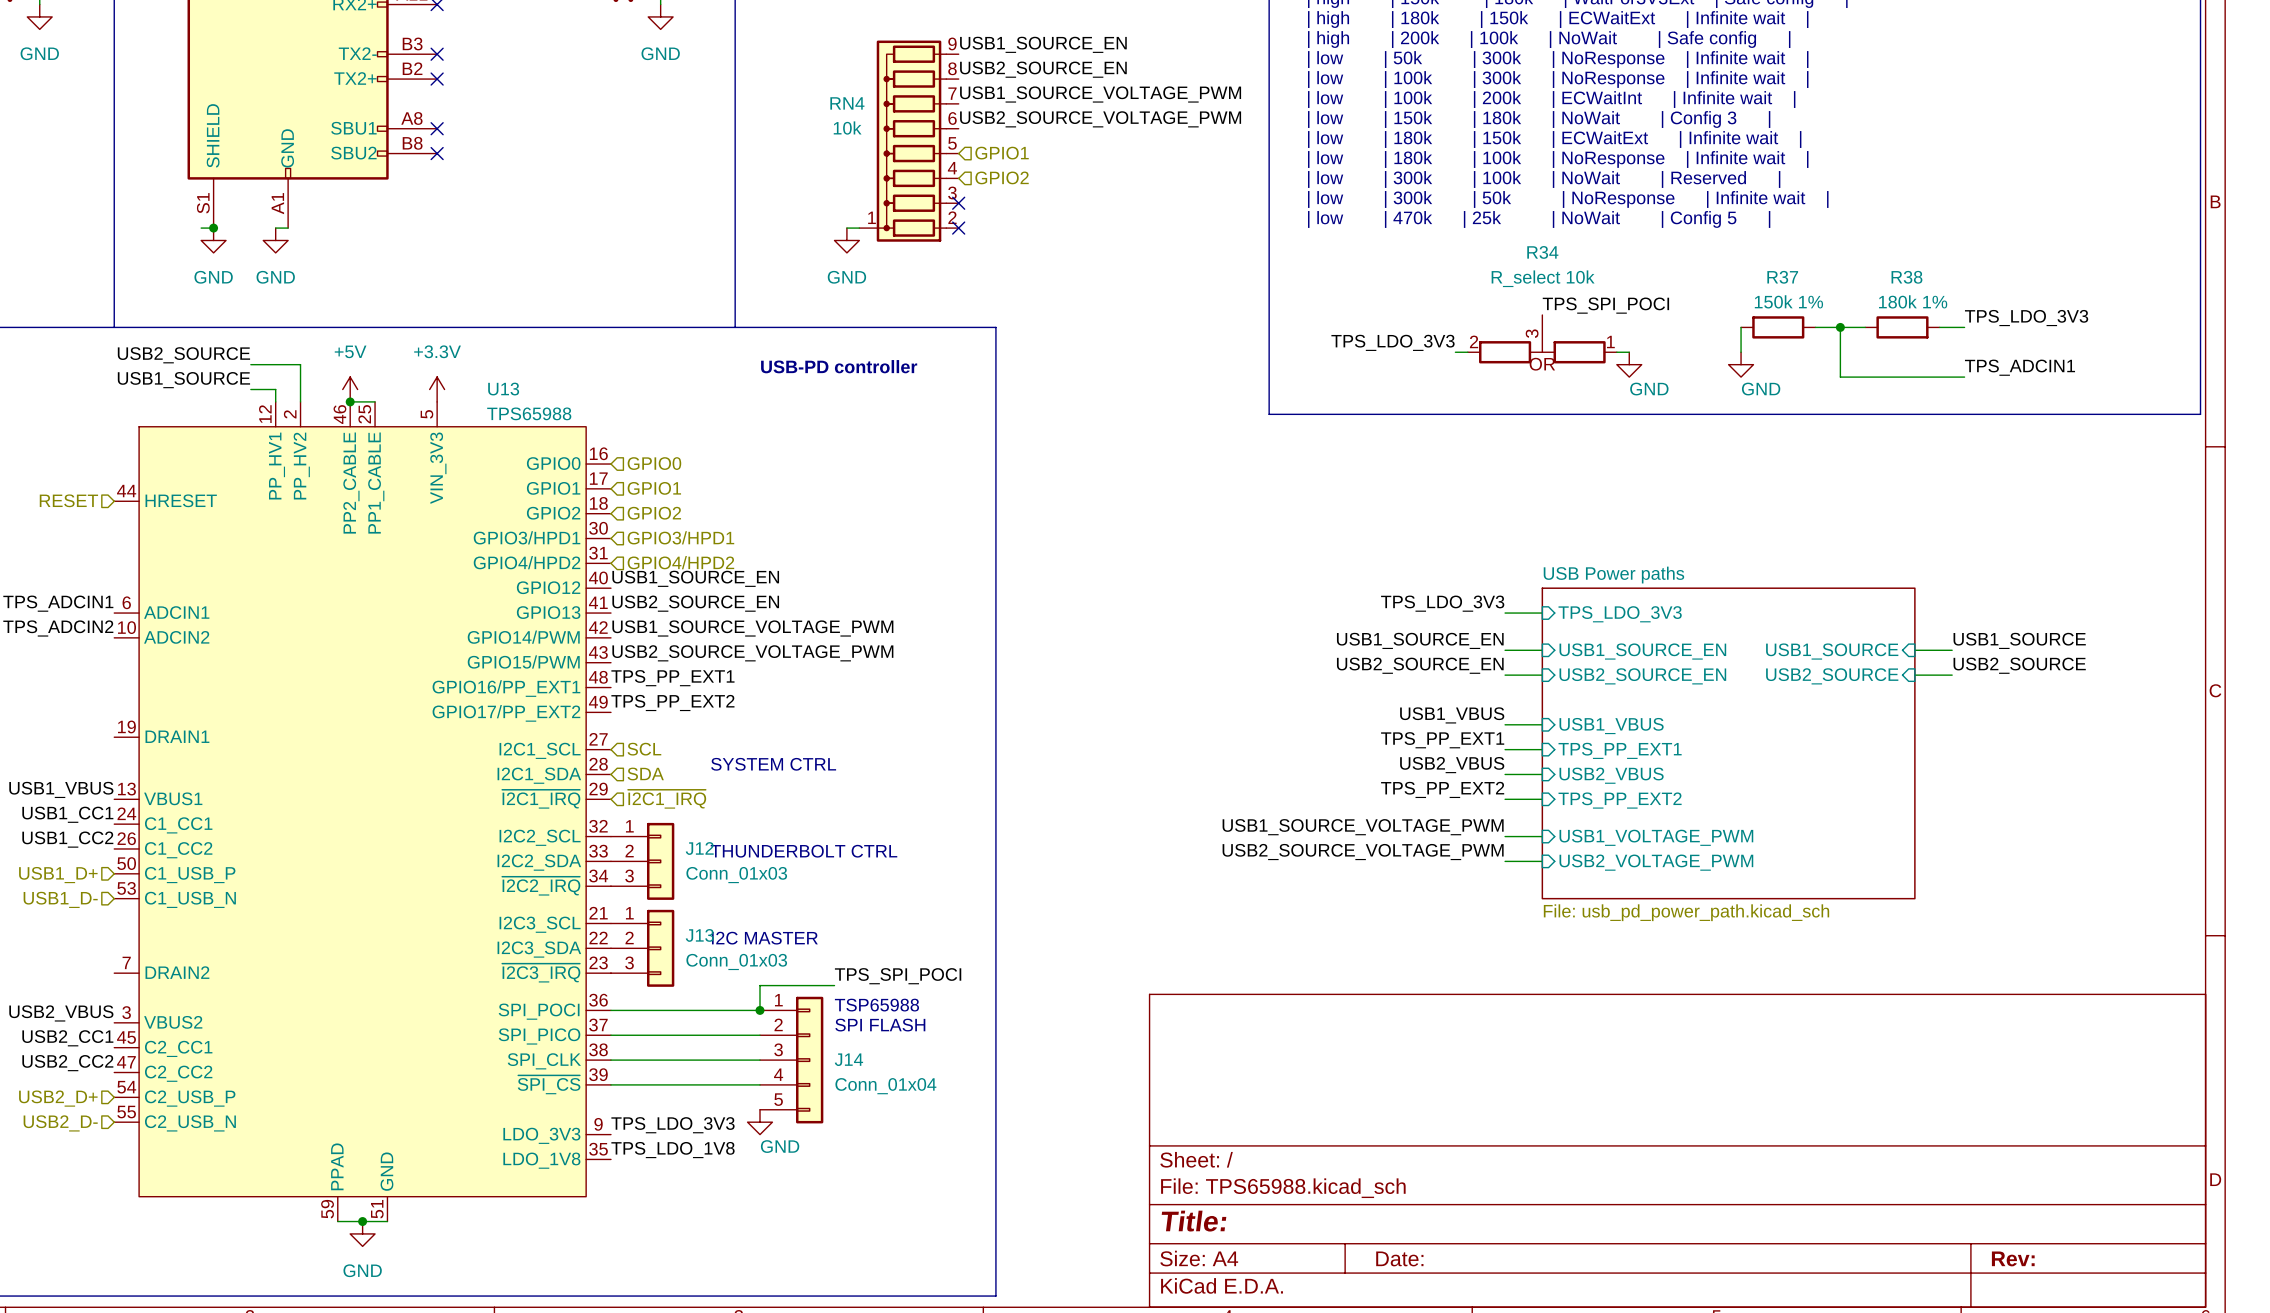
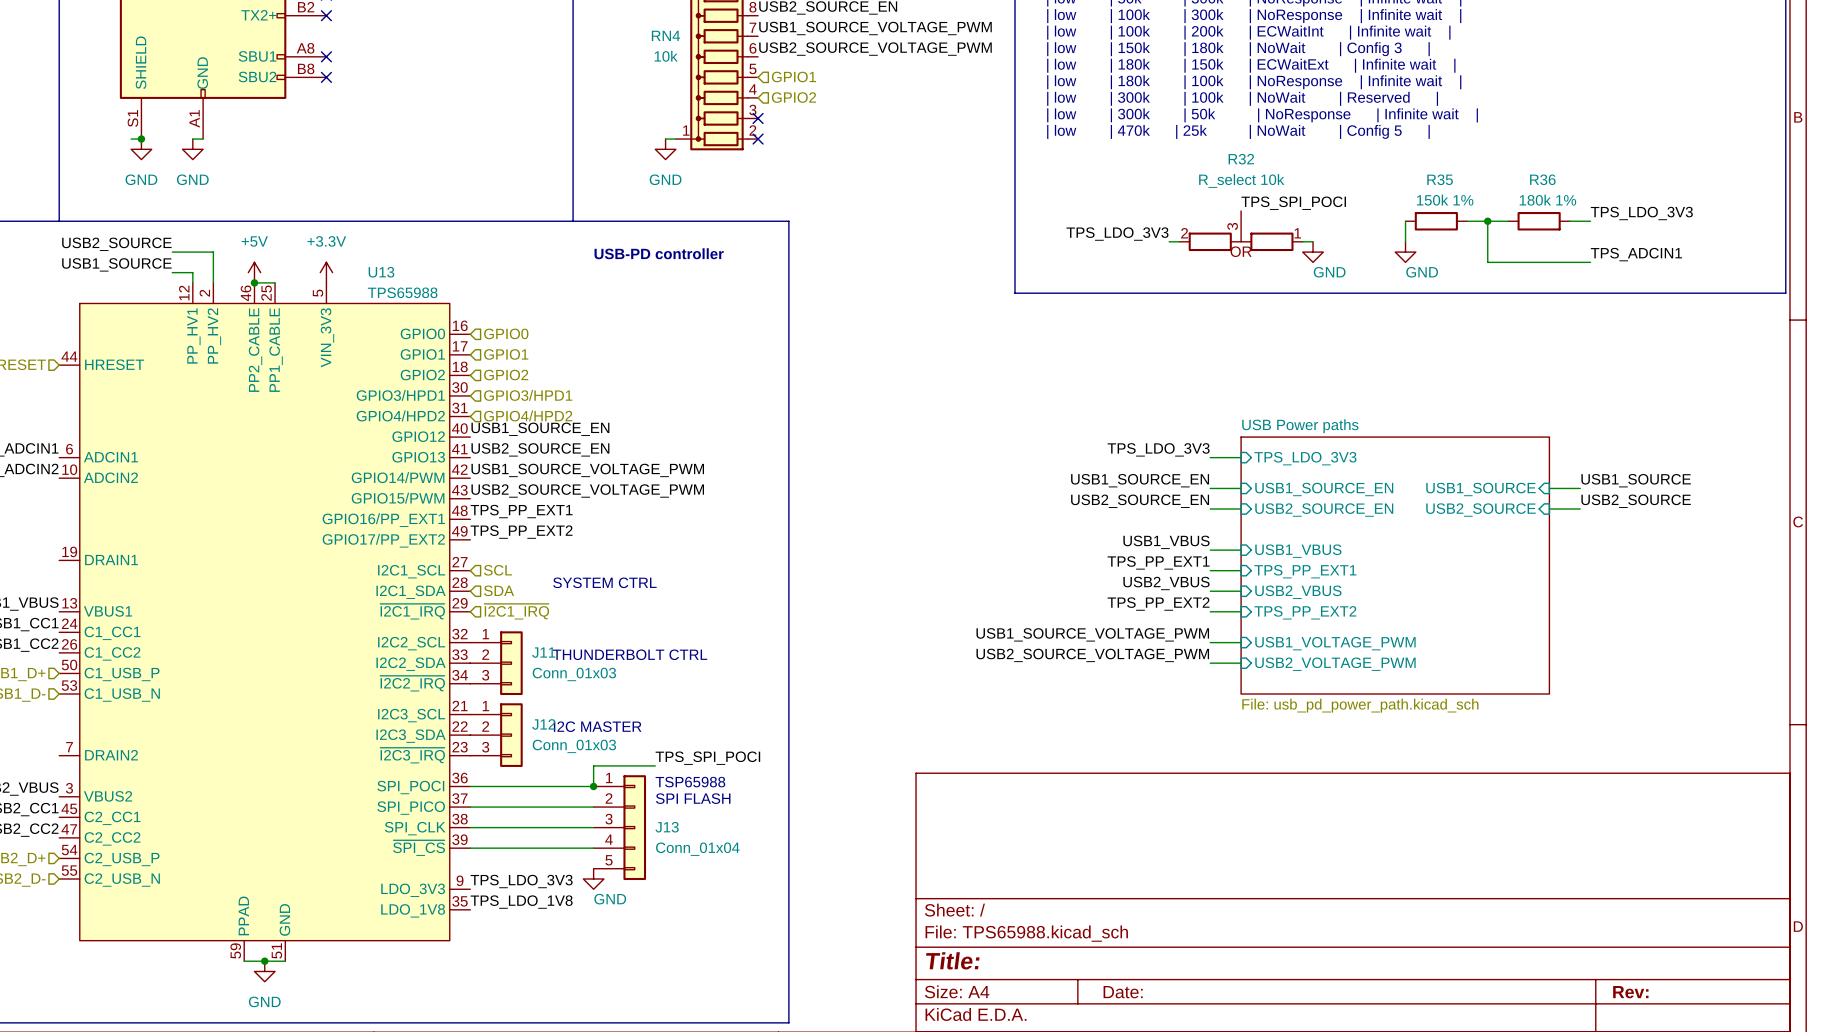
R34 name: R34 (1542, 252) -> R32 (1241, 159)
R37 name: R37 (1782, 277) -> R35 (1440, 179)
R38 name: R38 (1906, 277) -> R36 (1542, 179)
J12 name: J12 (699, 848) -> J11 (543, 652)
J13 name: J13 (699, 935) -> J12 (543, 724)
J14 name: J14 (848, 1059) -> J13 (667, 827)

